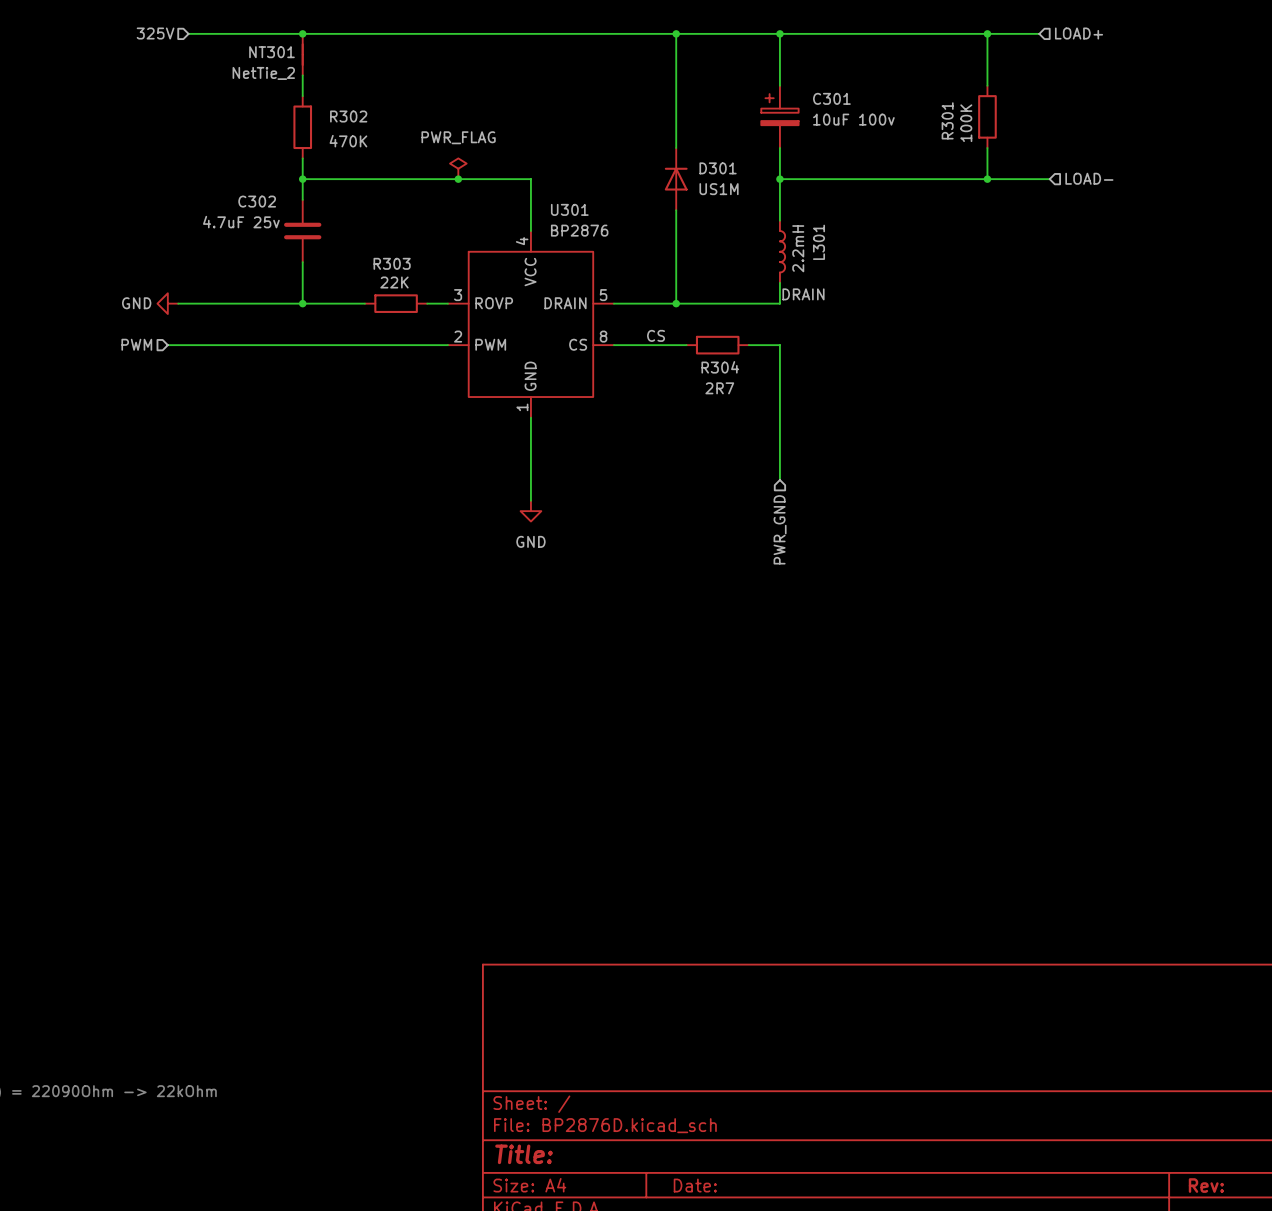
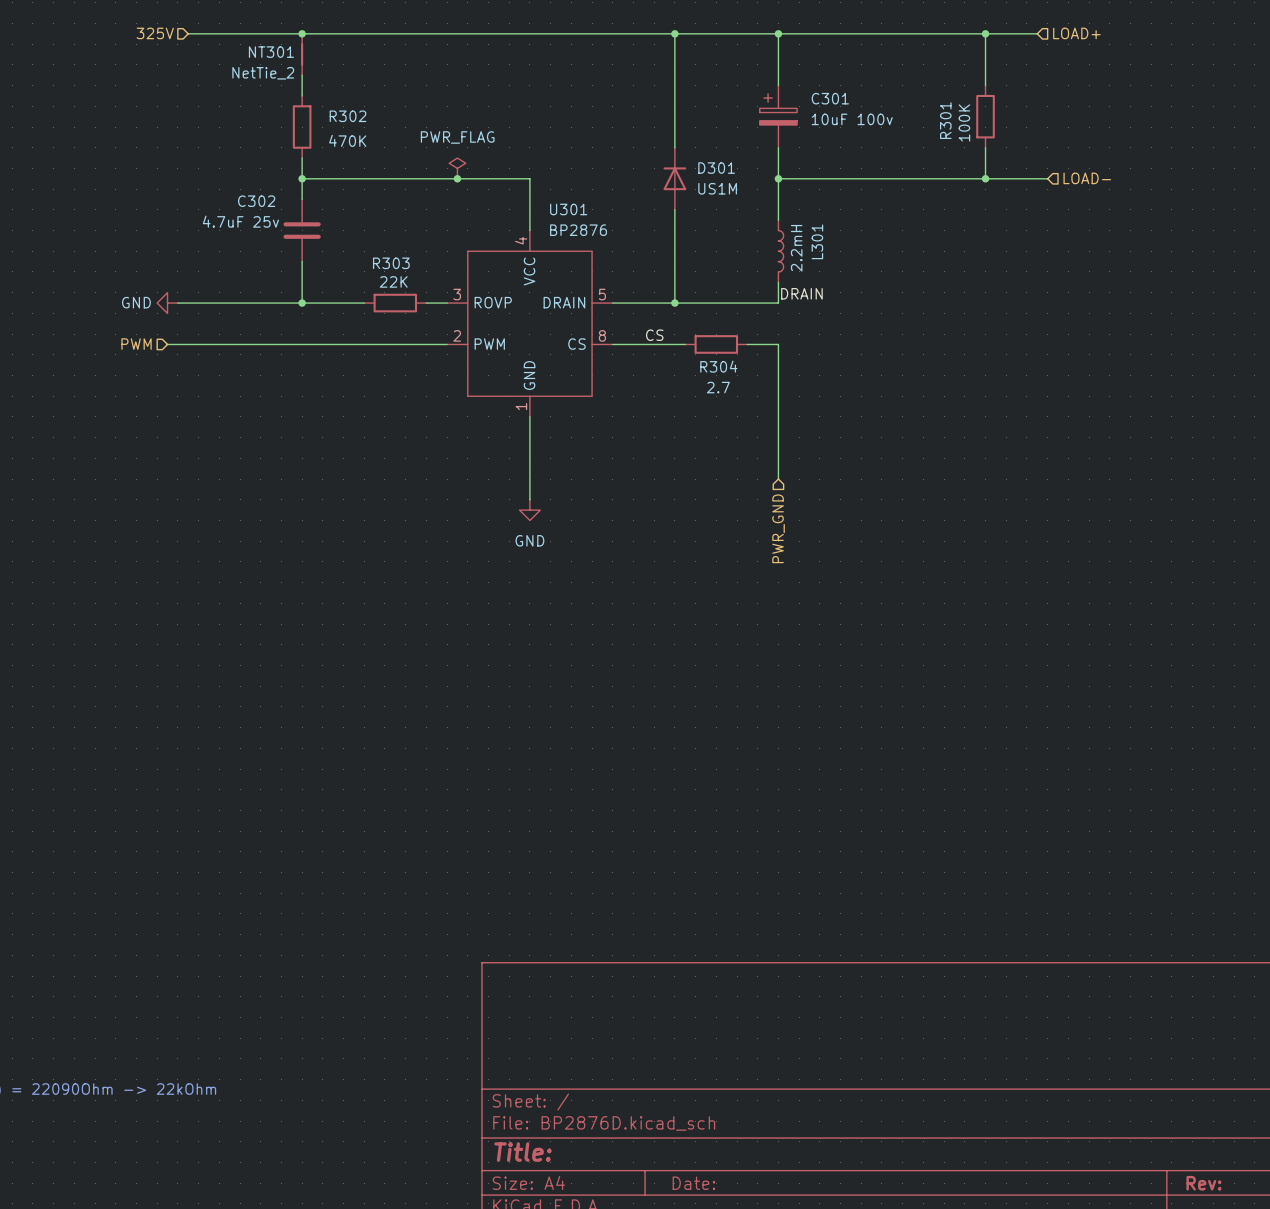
R304 value: 2R7 (719, 388) -> 2.7 (718, 387)

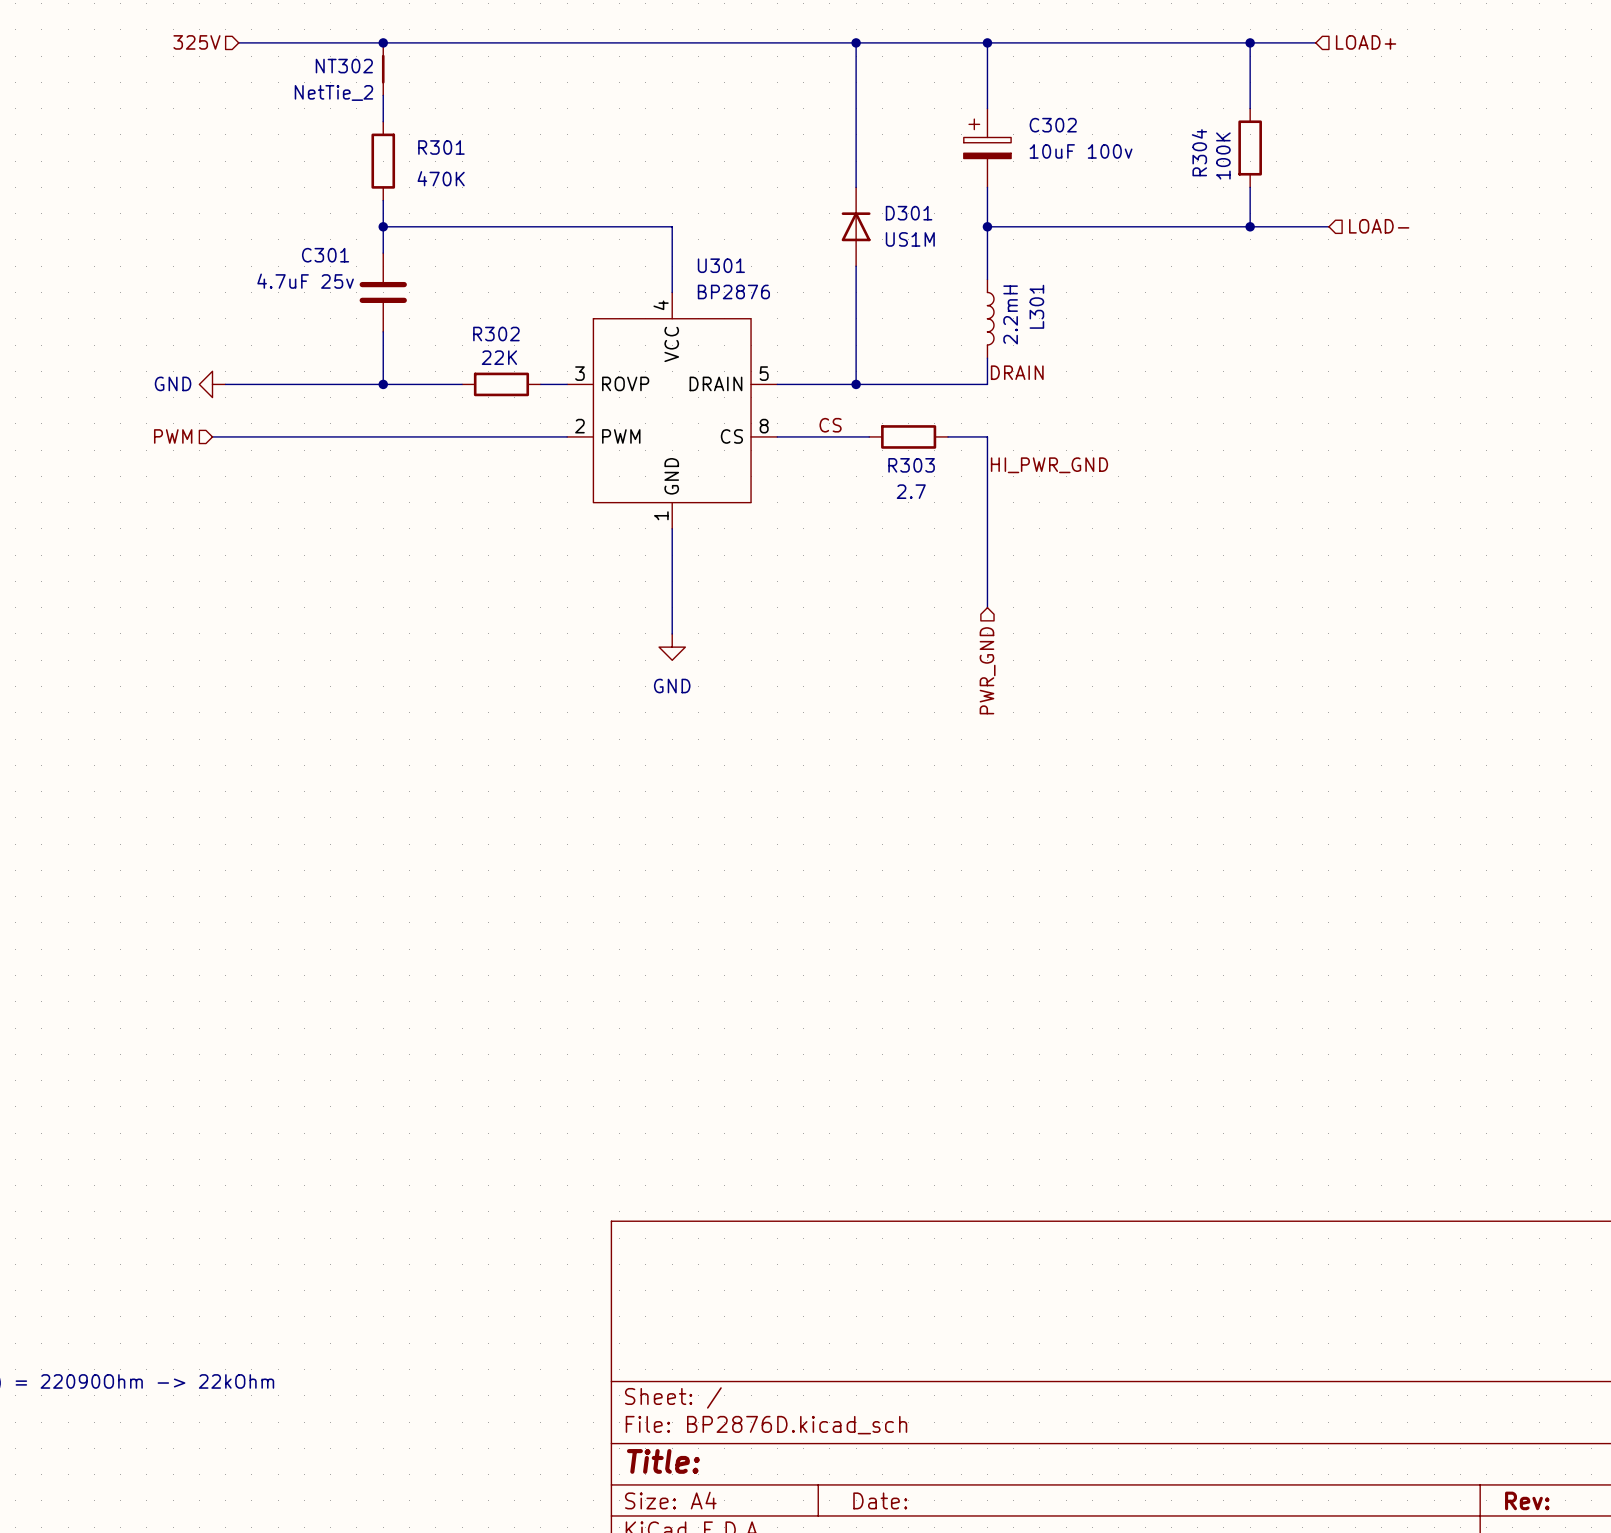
NT301 name: NT301 (271, 52) -> NT302 (344, 66)
C301 name: C301 (830, 98) -> C302 (1053, 125)
R302 name: R302 (348, 116) -> R301 (441, 147)
R301 name: R301 (945, 120) -> R304 (1199, 152)
power symbol: PWR_FLAG (457, 168) -> none
junction: (457, 178) -> none
C302 name: C302 (256, 201) -> C301 (325, 255)
R303 name: R303 (391, 263) -> R302 (496, 334)
R304 name: R304 (718, 366) -> R303 (911, 465)
label: none -> HI_PWR_GND (1049, 465)

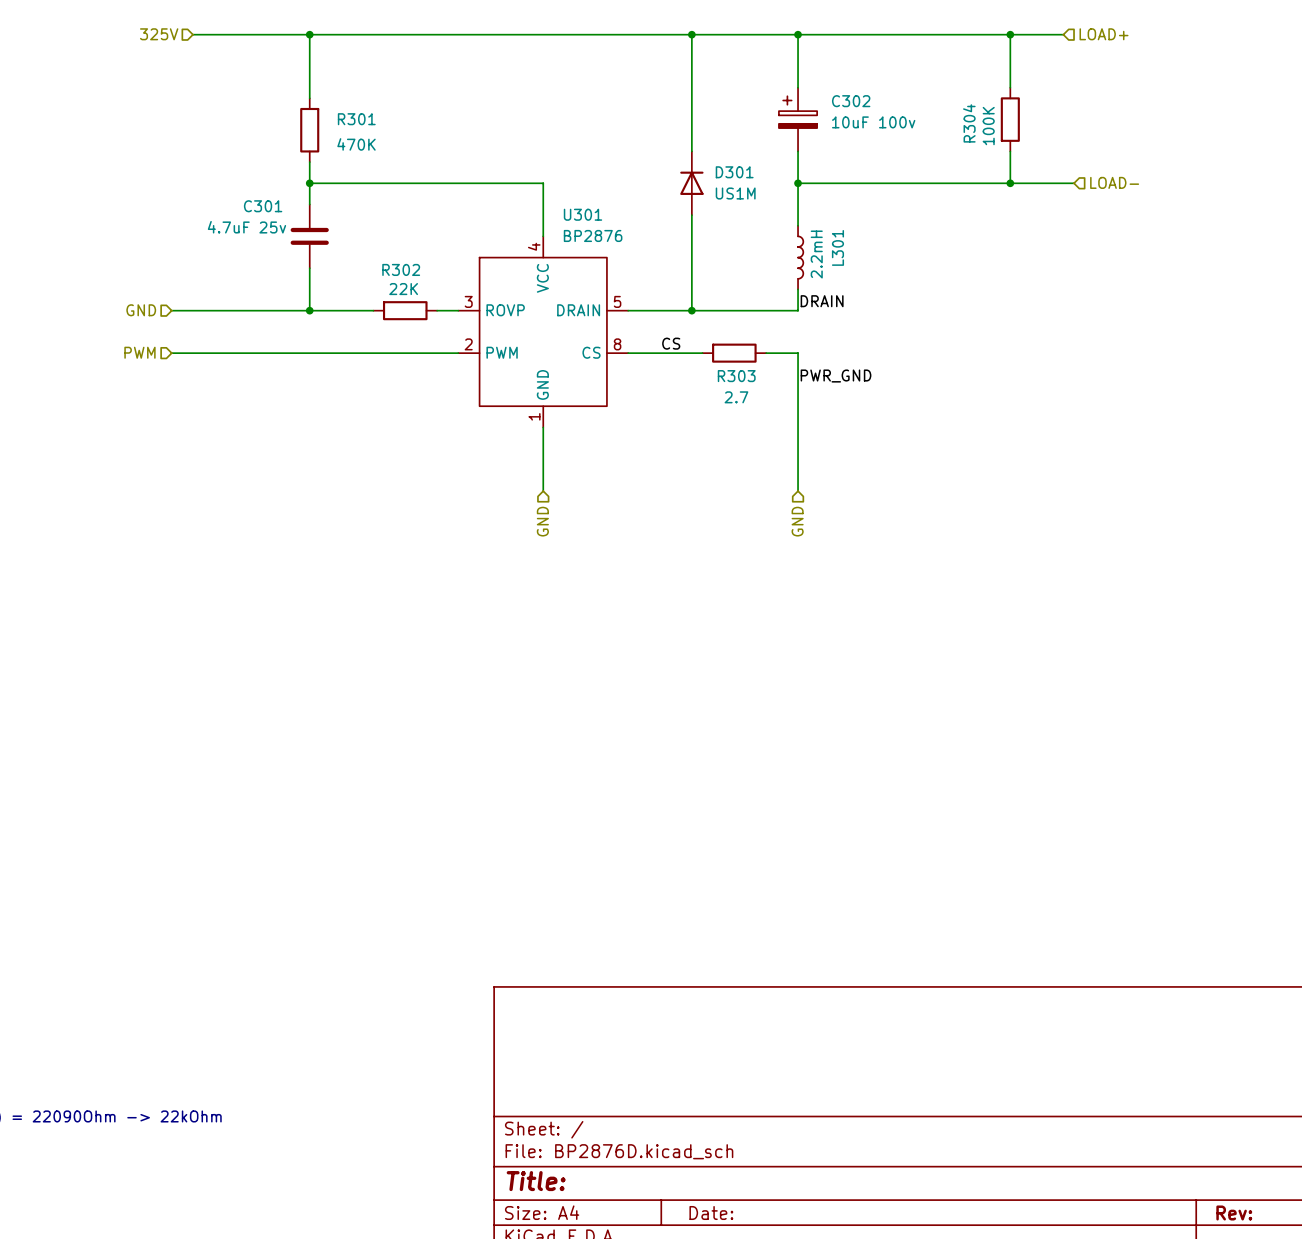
NT302: NetTie_2 (383, 69) -> none
hierarchical label: none -> GND (141, 310)
power symbol: GND (212, 384) -> none
label: HI_PWR_GND (1049, 465) -> PWR_GND (836, 376)
wire: (672, 607) (672, 633) -> none
hierarchical label: none -> GND (542, 521)
power symbol: GND (672, 647) -> none
hierarchical label: PWR_GND (987, 670) -> GND (797, 521)

